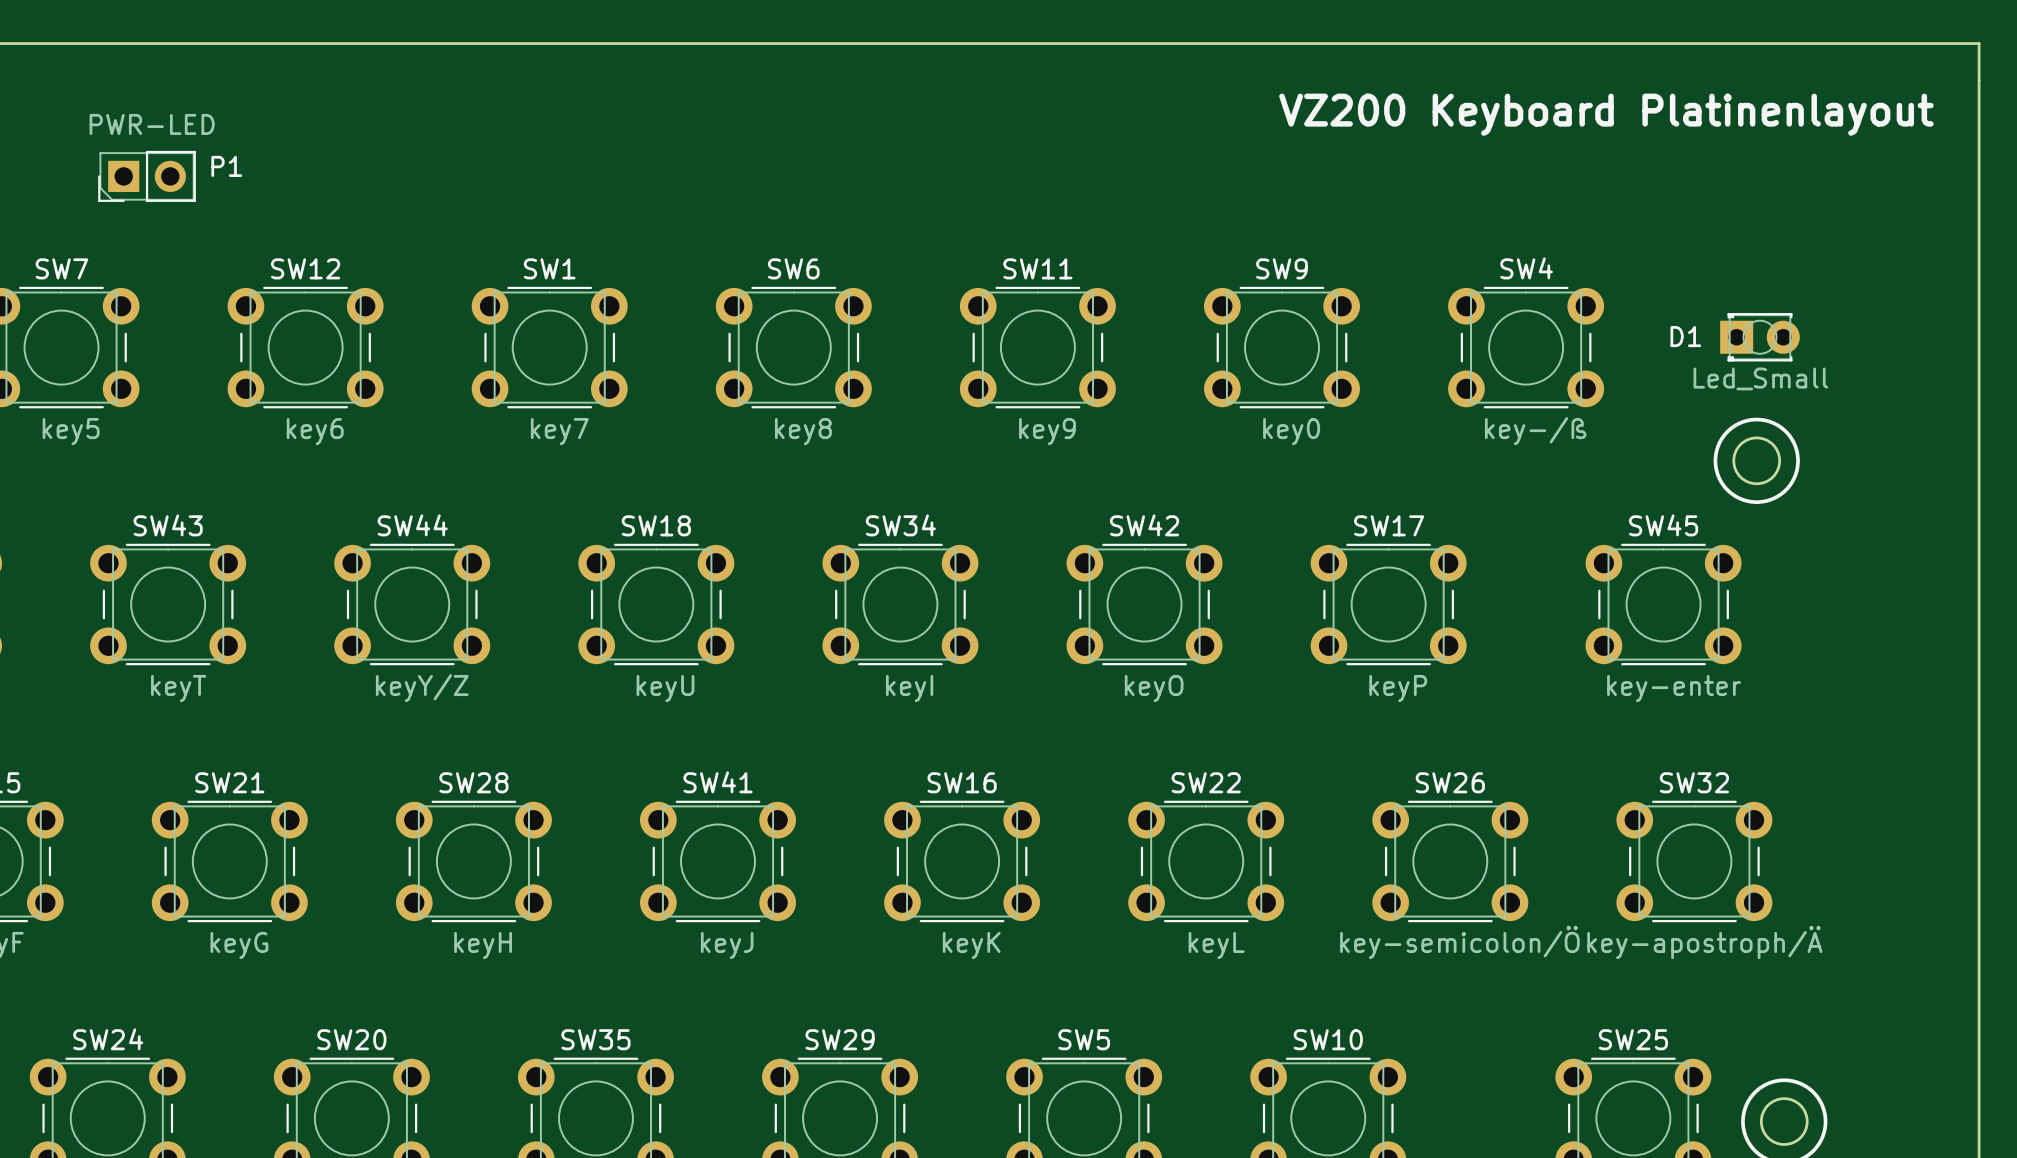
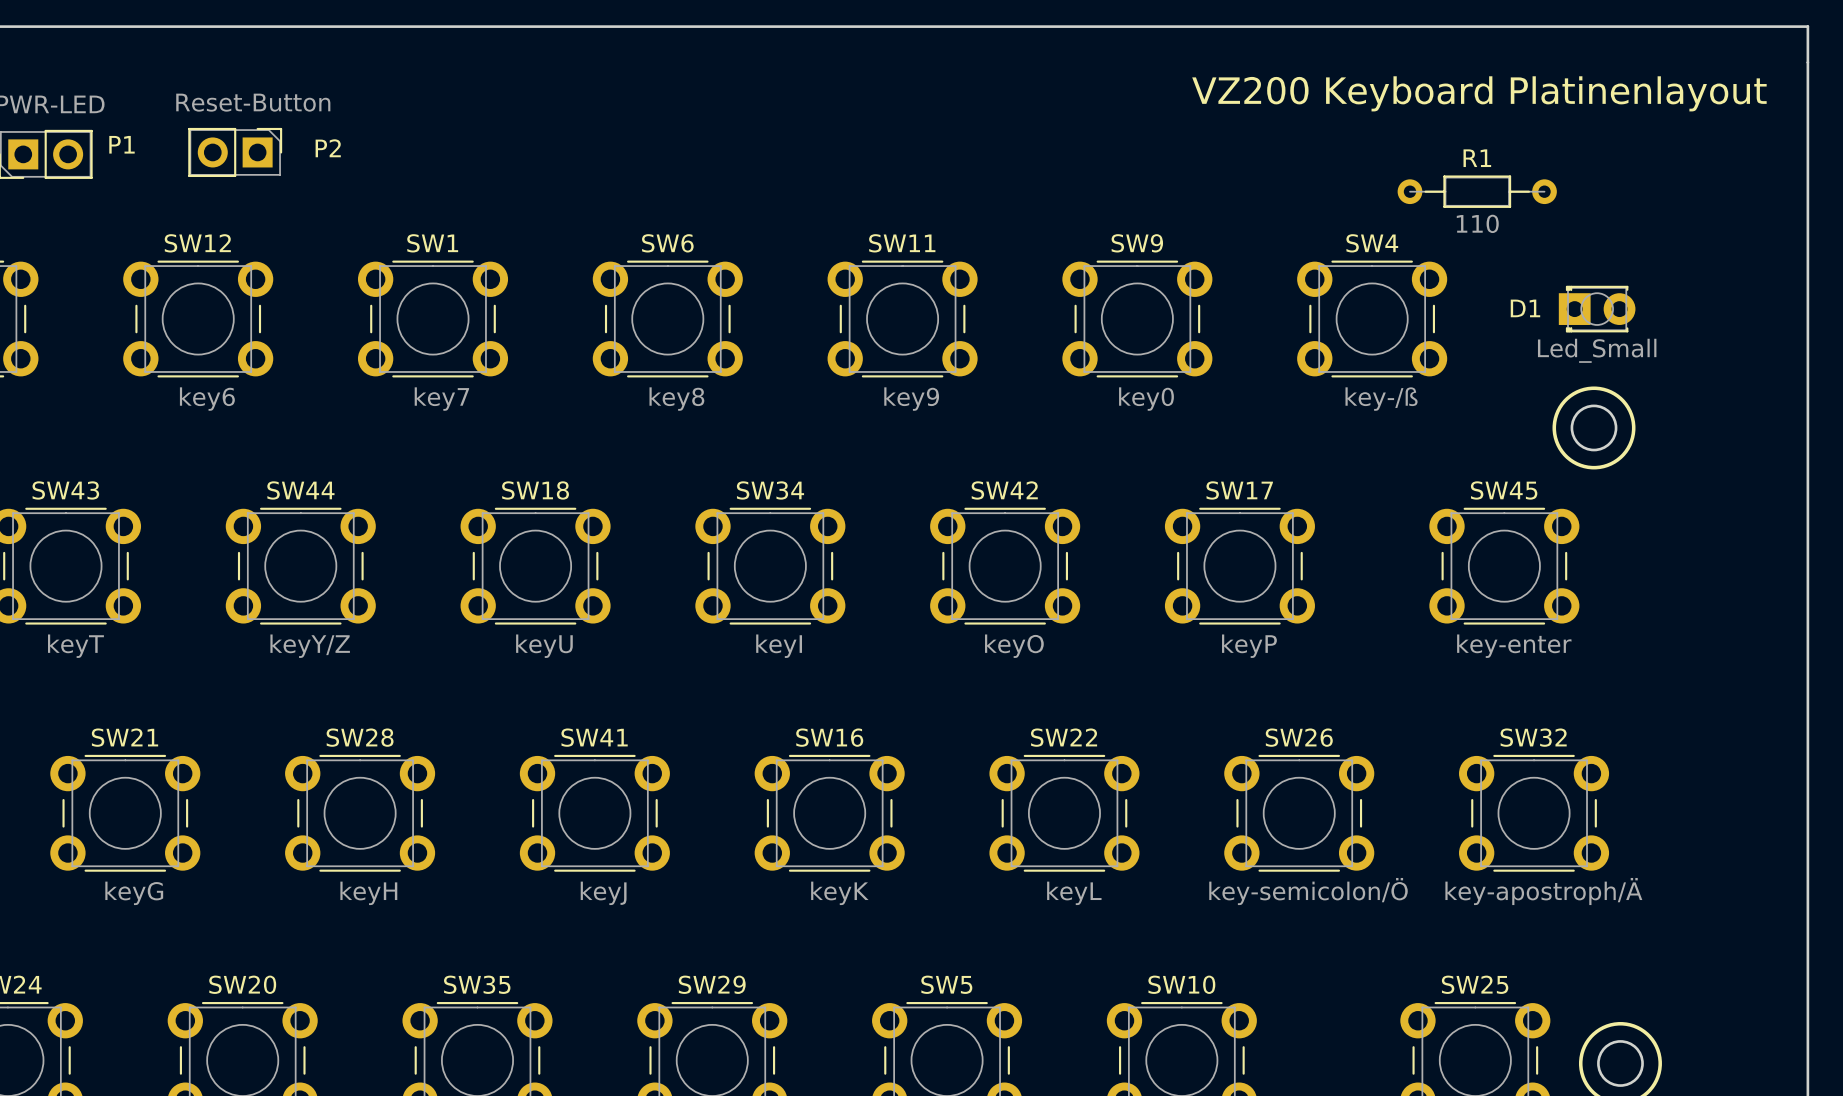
P2: none -> Reset-Button (235, 152)
R1: none -> 110 (1477, 191)

